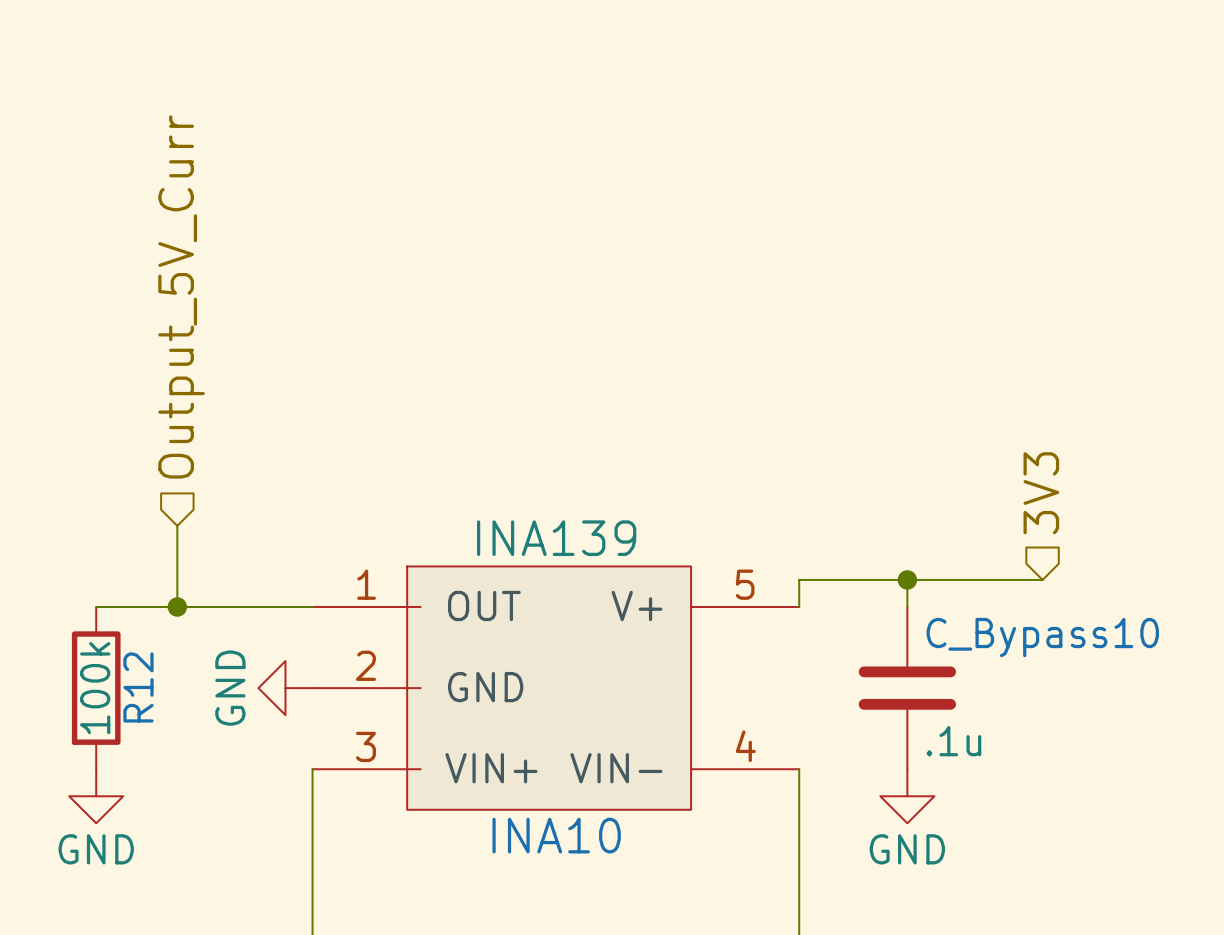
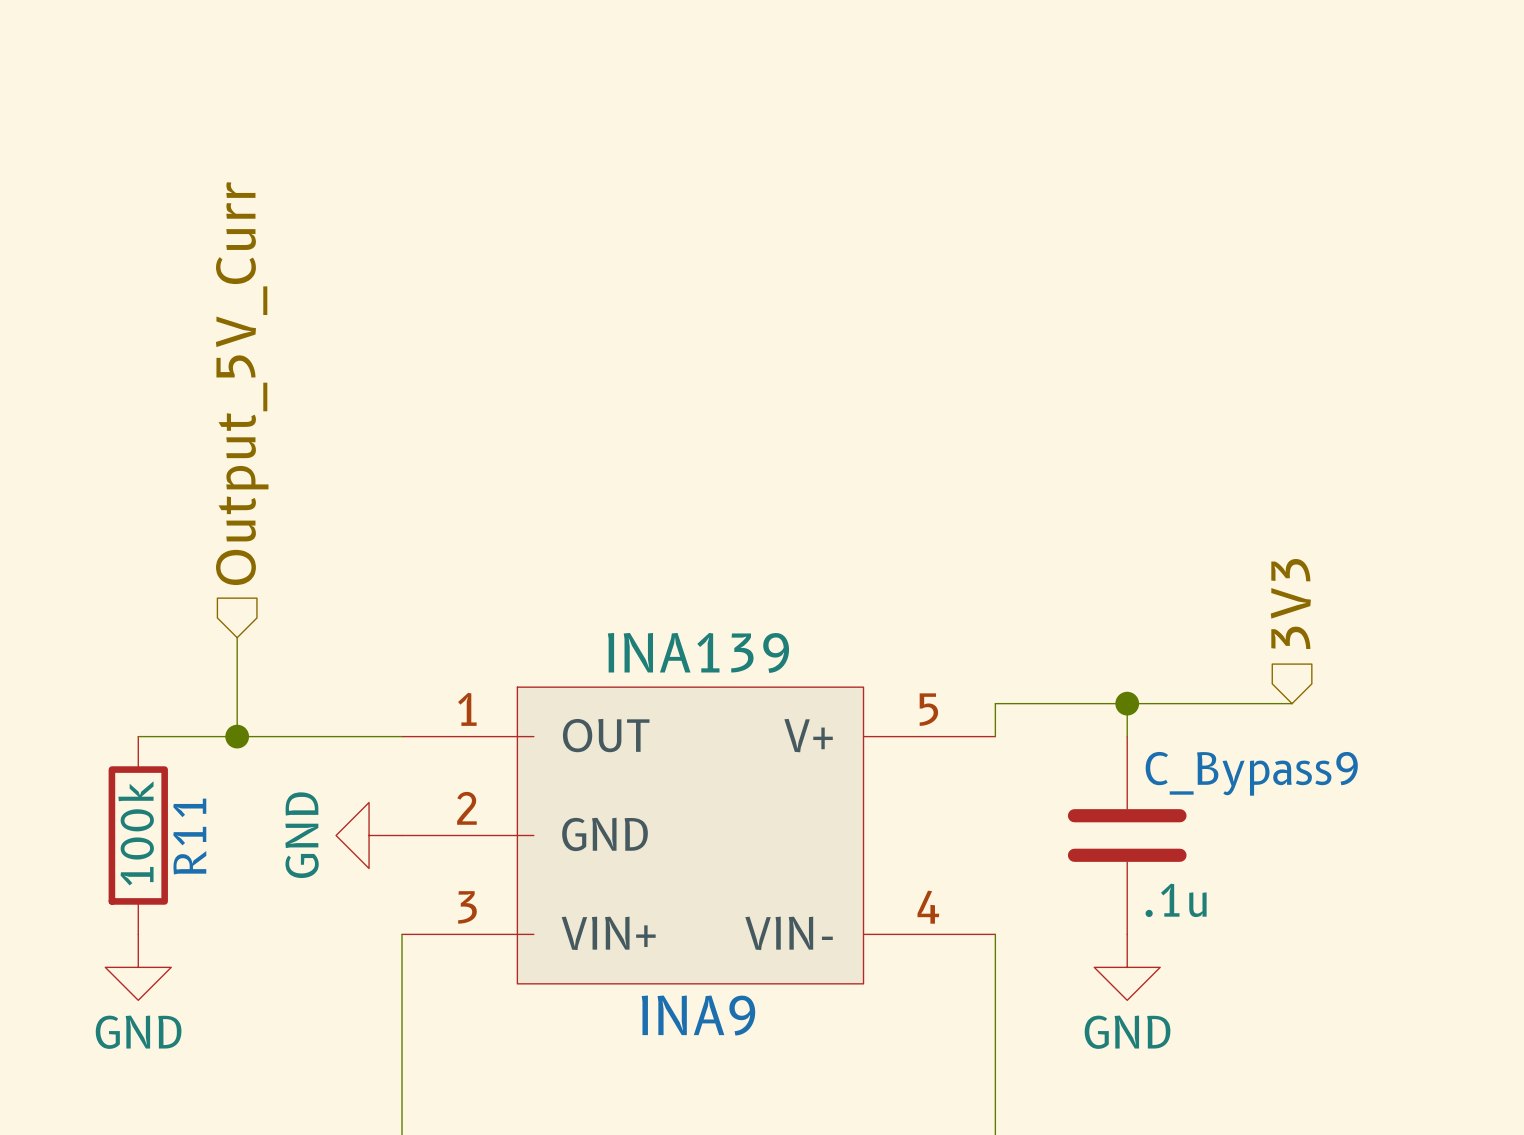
C_Bypass10 name: C_Bypass10 (1042, 637) -> C_Bypass9 (1251, 773)
R12 name: R12 (138, 687) -> R11 (189, 836)
INA10 name: INA10 (556, 835) -> INA9 (698, 1015)

